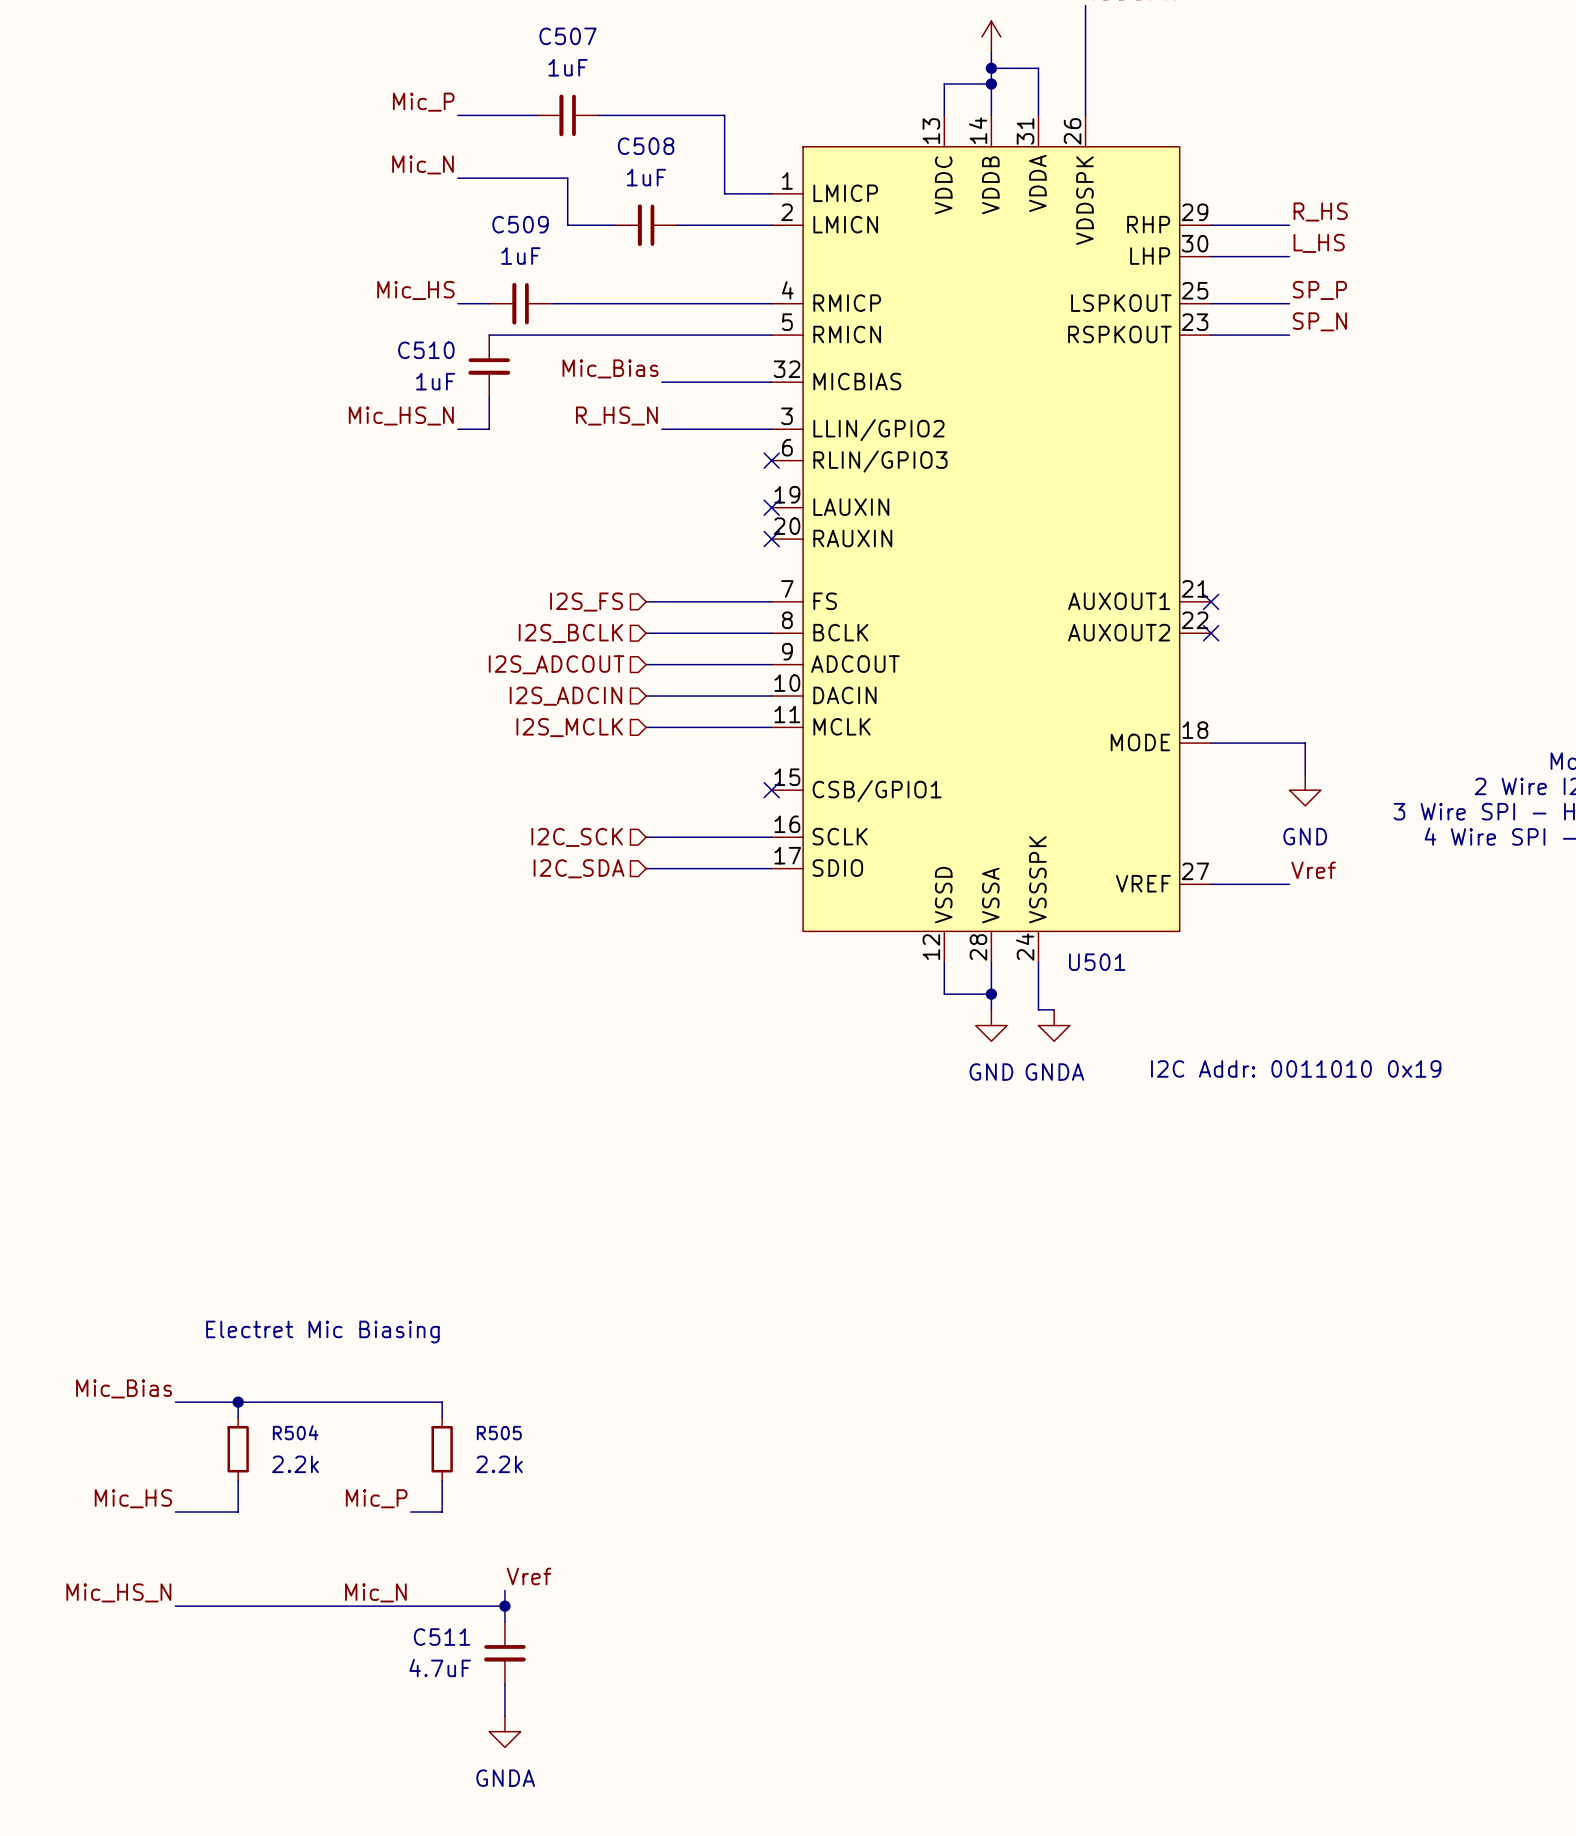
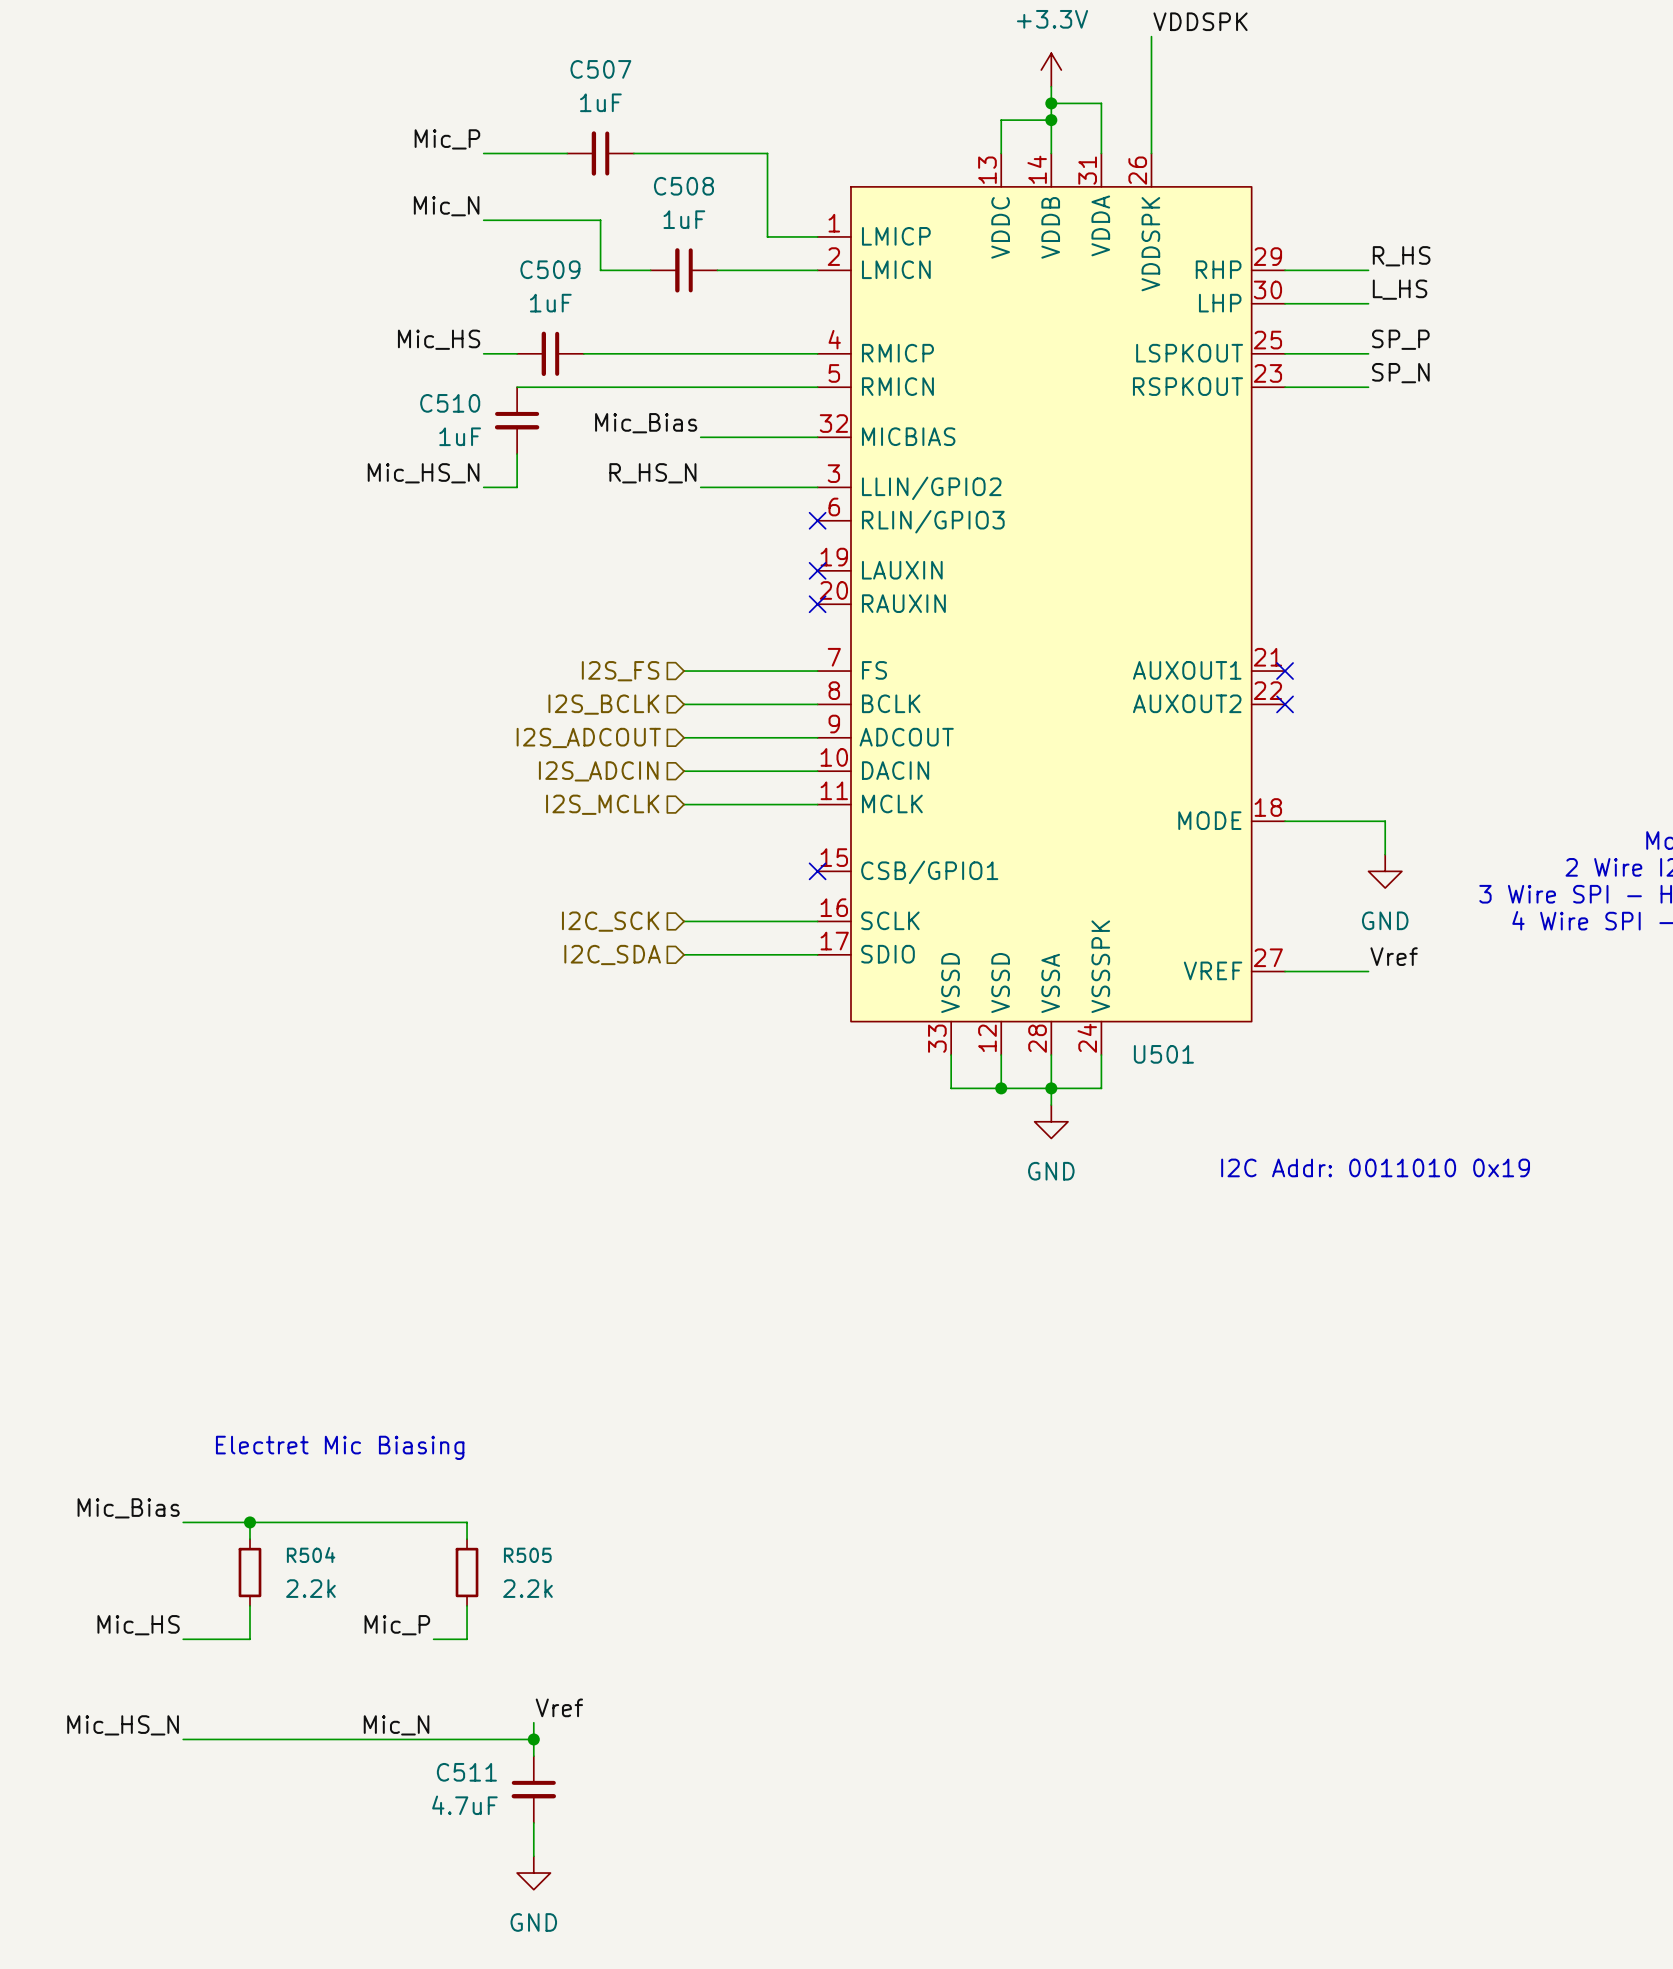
U501 symbol: [771, 115, 1212, 963] -> [817, 153, 1286, 1055]
wire: none -> (951, 1054) (951, 1088) (1001, 1088)
junction: none -> (1001, 1088)
wire: (1038, 994) (1038, 1009) (1054, 1009) -> (1101, 1088) (1051, 1088)
power symbol: GNDA (1054, 1025) -> none
power symbol: GNDA (504, 1731) -> GND (533, 1873)

